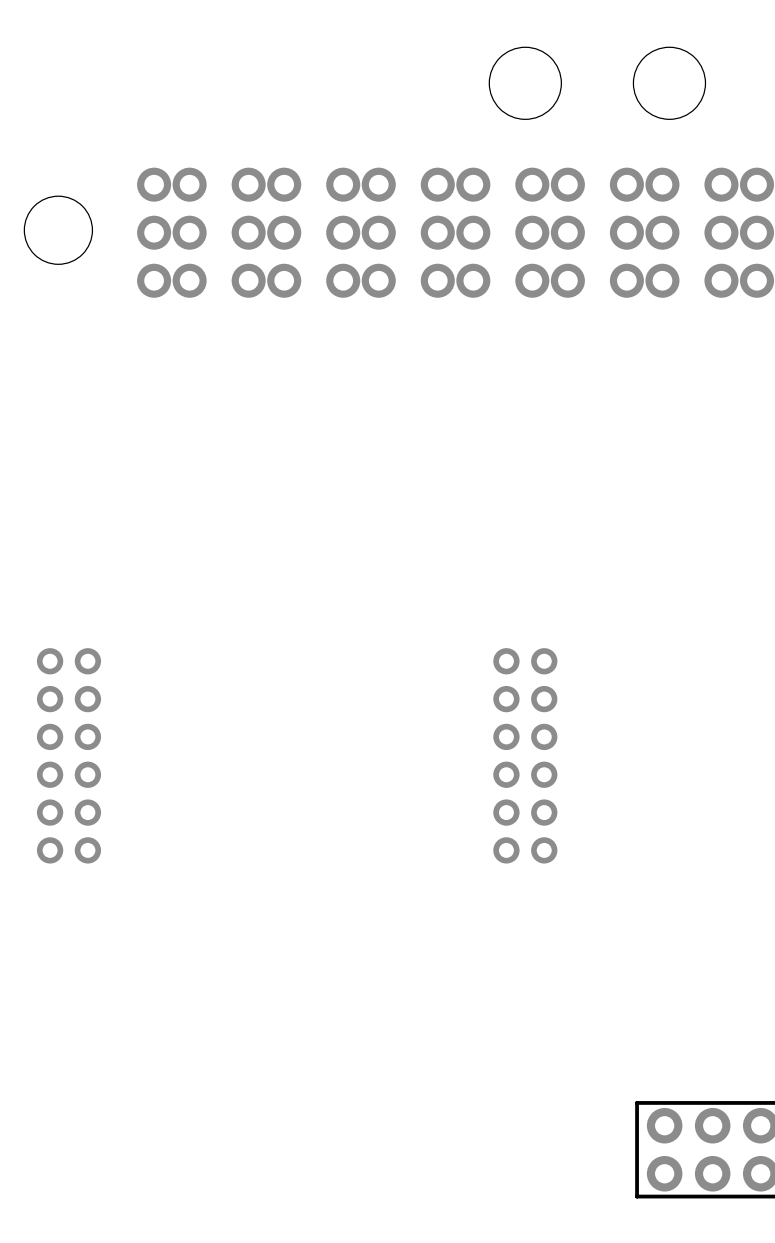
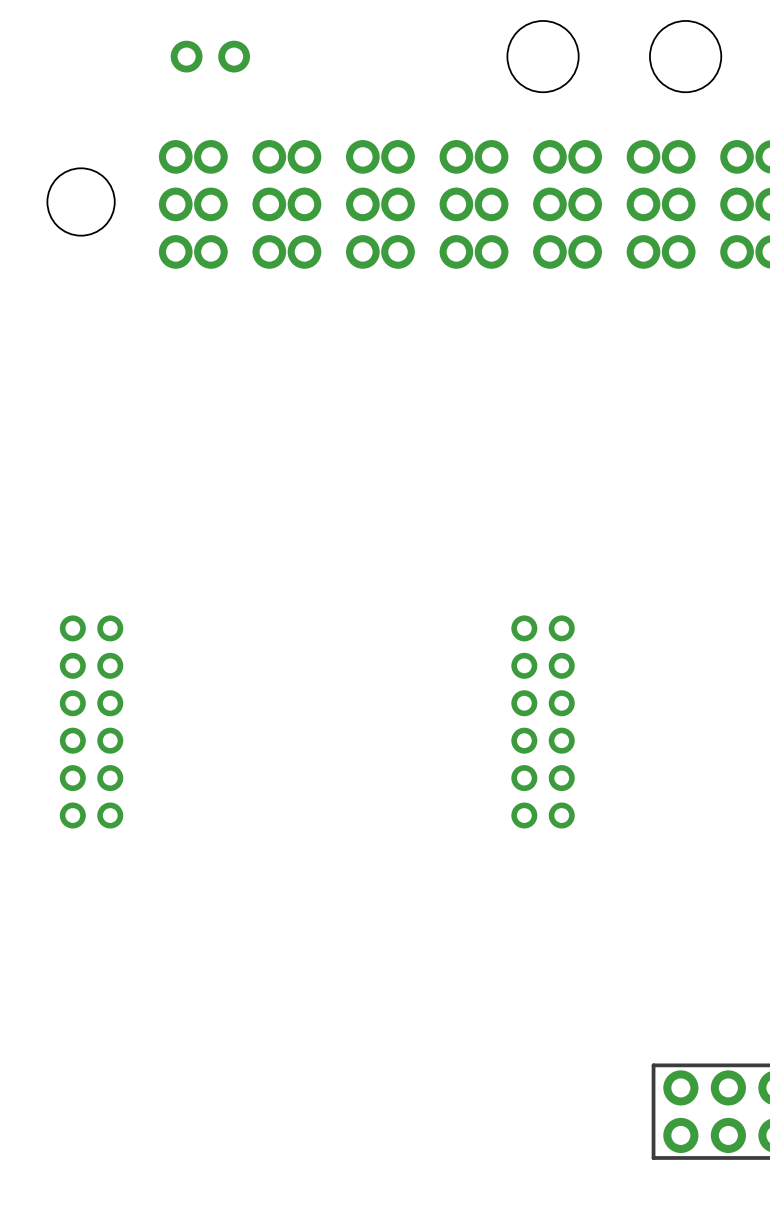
part: none -> (210, 56)

